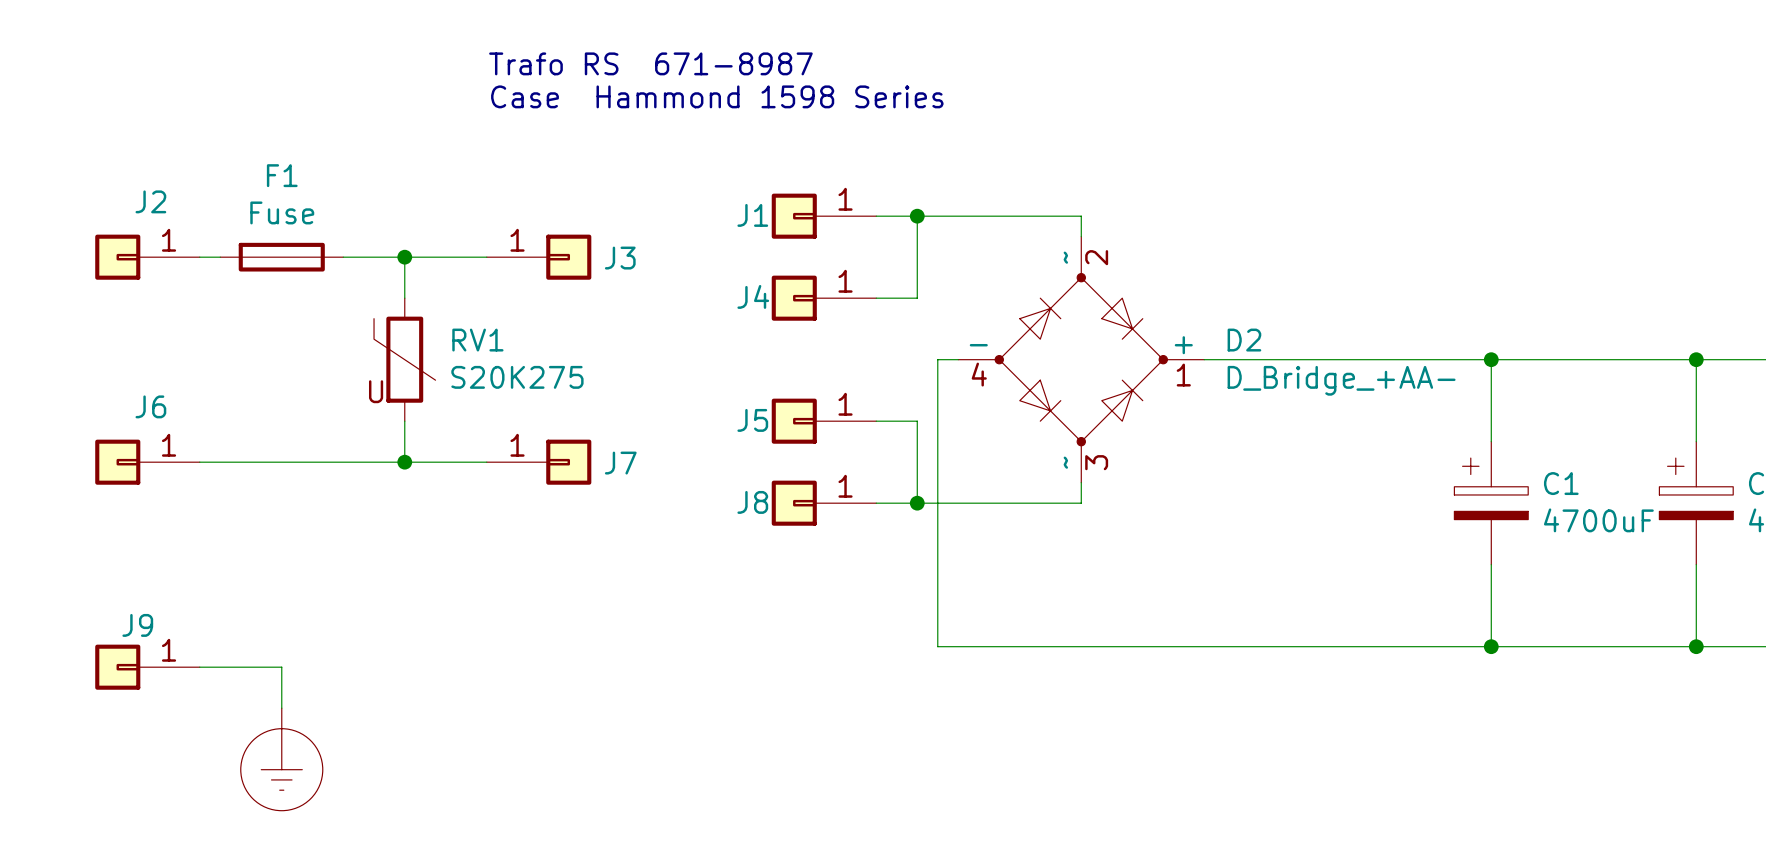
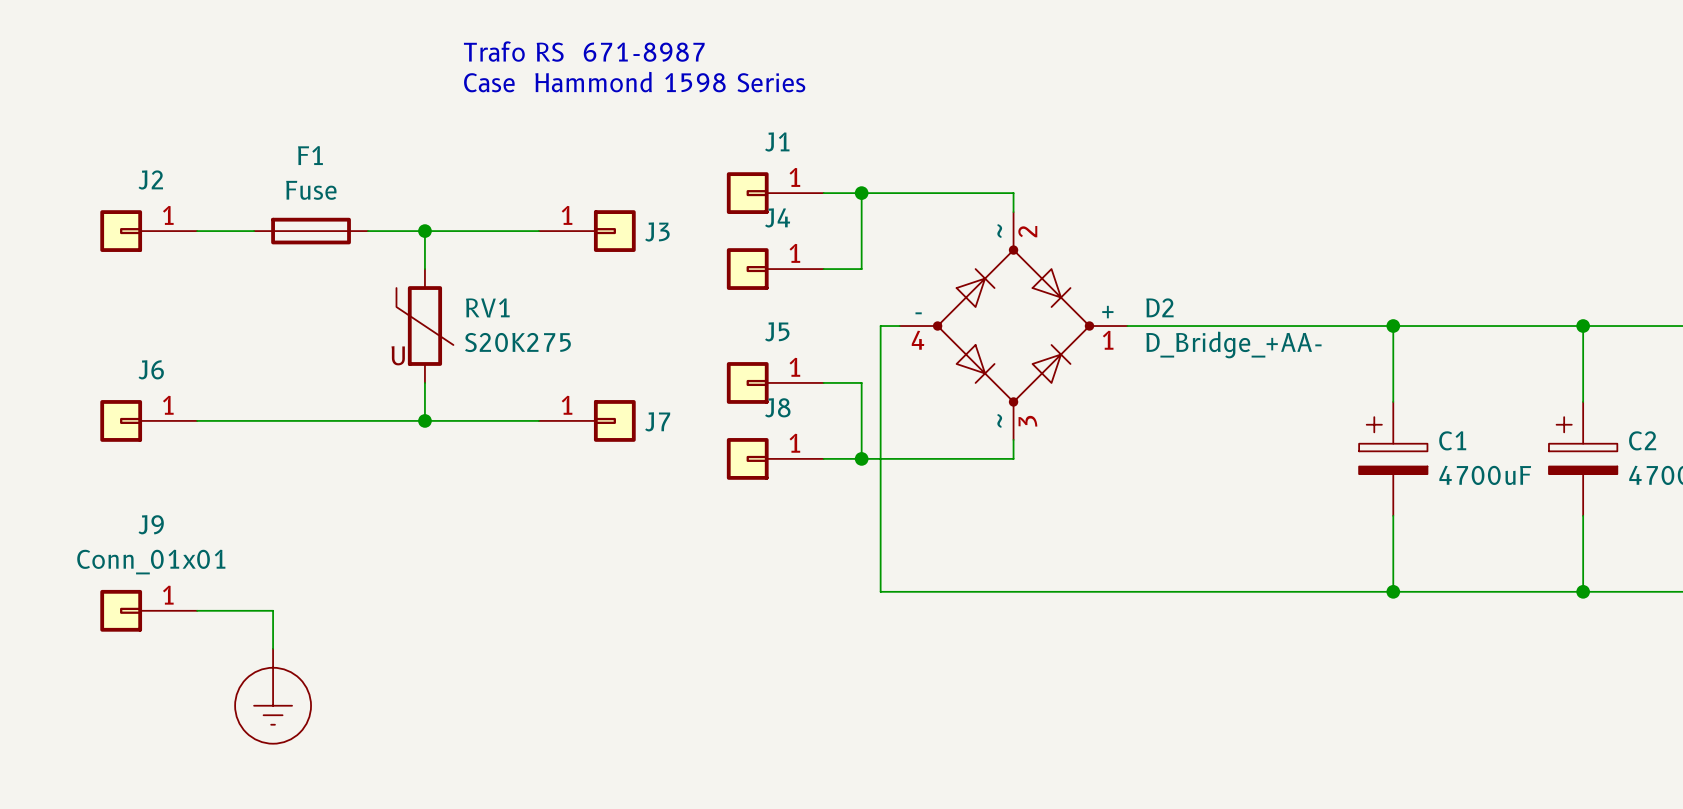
J1 name position: J1 (752, 215) -> J1 (777, 141)
F1 position: (281, 257) -> (311, 231)
wire: (404, 257) (404, 298) -> (424, 231) (424, 269)
junction position: (404, 257) -> (424, 231)
J3 position: (539, 257) -> (587, 231)
J4 name position: J4 (753, 296) -> J4 (777, 217)
RV1 position: (404, 359) -> (424, 326)
J5 name position: J5 (752, 420) -> J5 (777, 331)
wire: (404, 421) (404, 462) -> (424, 382) (424, 420)
junction position: (404, 462) -> (424, 420)
J7 position: (539, 462) -> (587, 420)
J8 name position: J8 (752, 502) -> J8 (777, 407)
J9 value: none -> Conn_01x01 (151, 562)
J9 name position: J9 (137, 625) -> J9 (151, 524)

